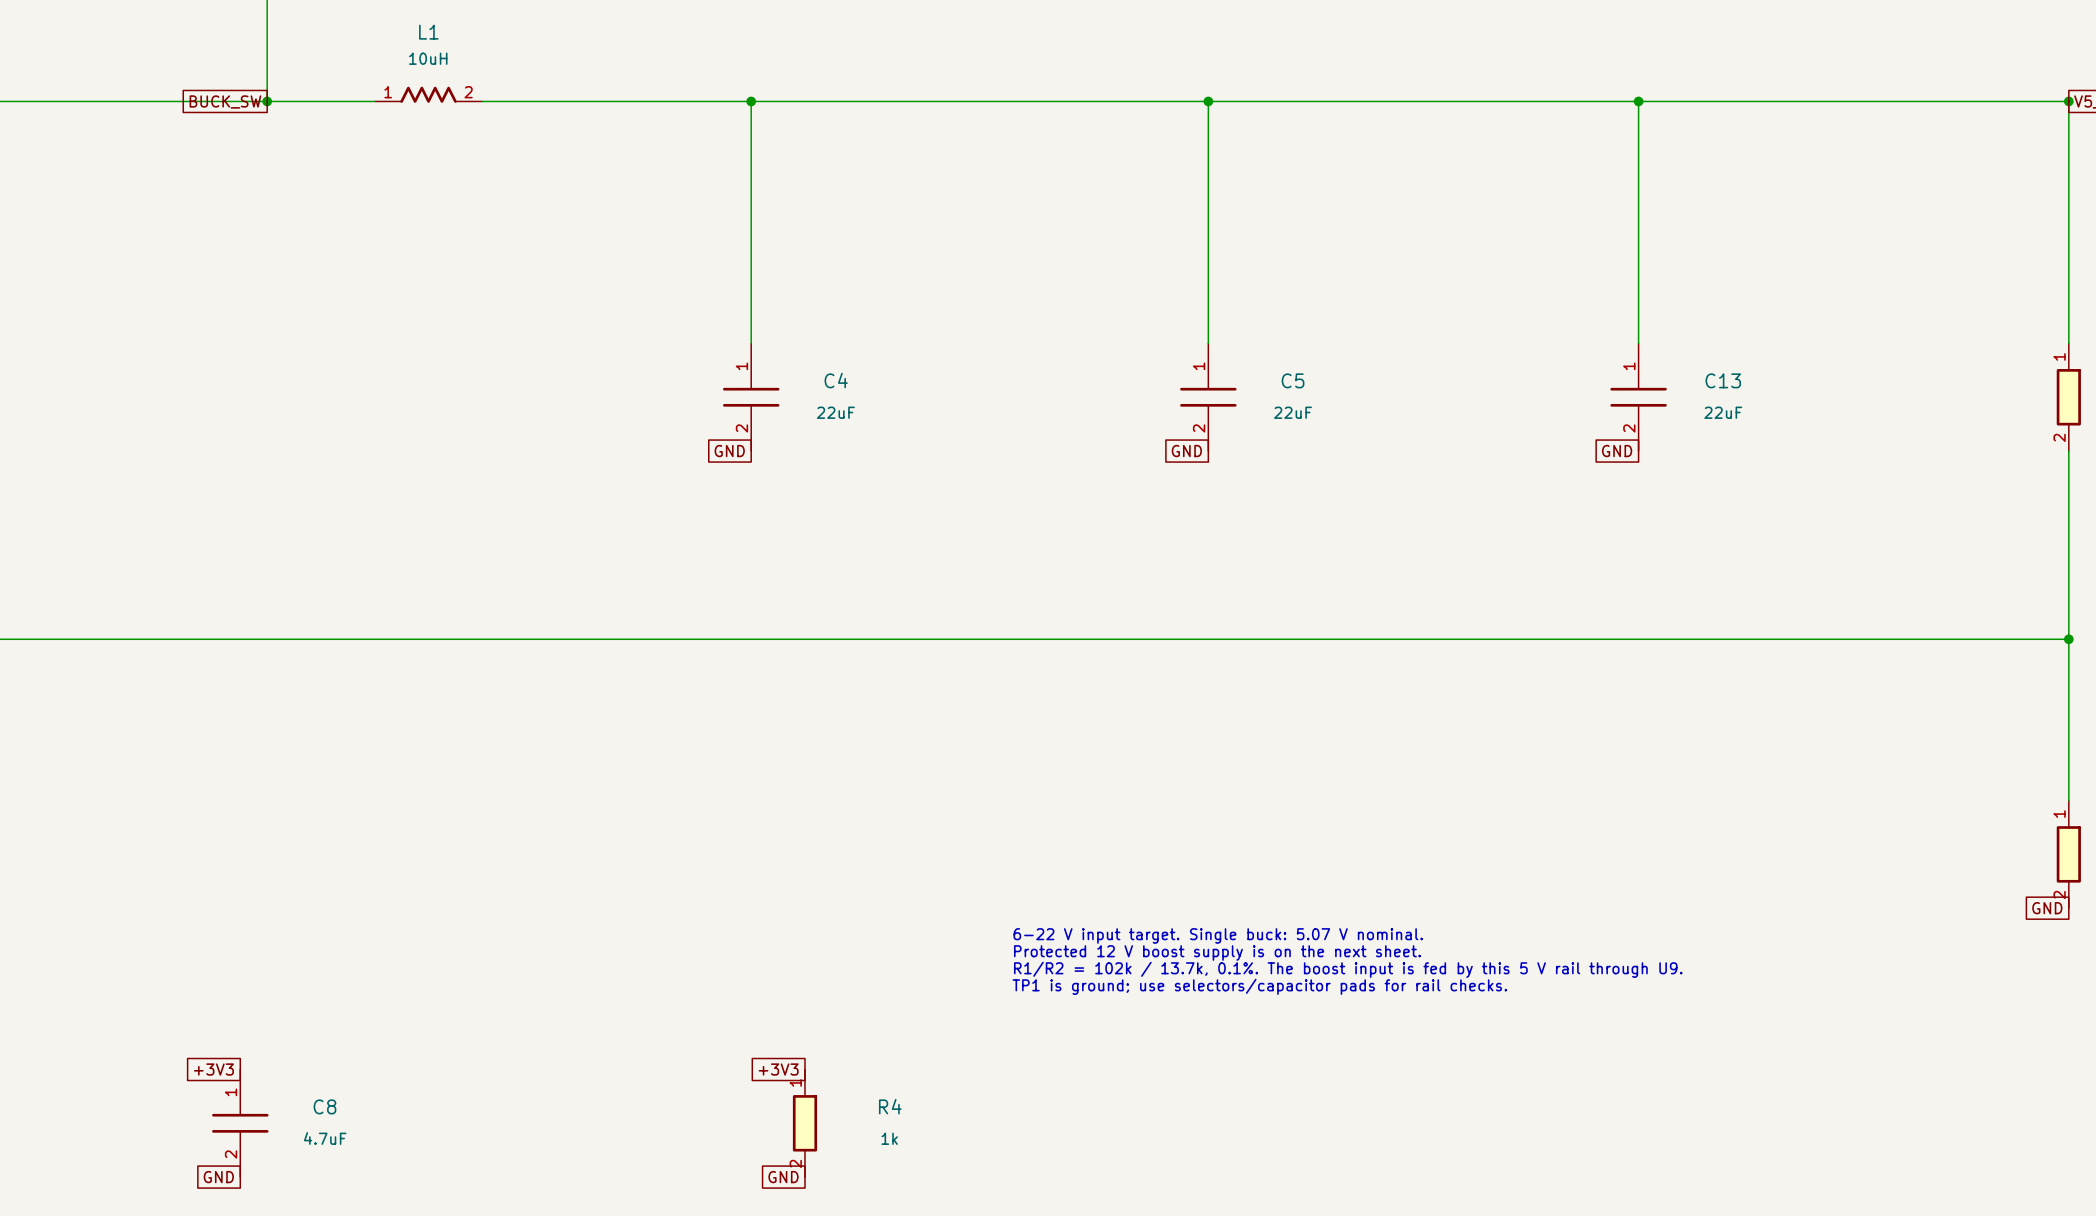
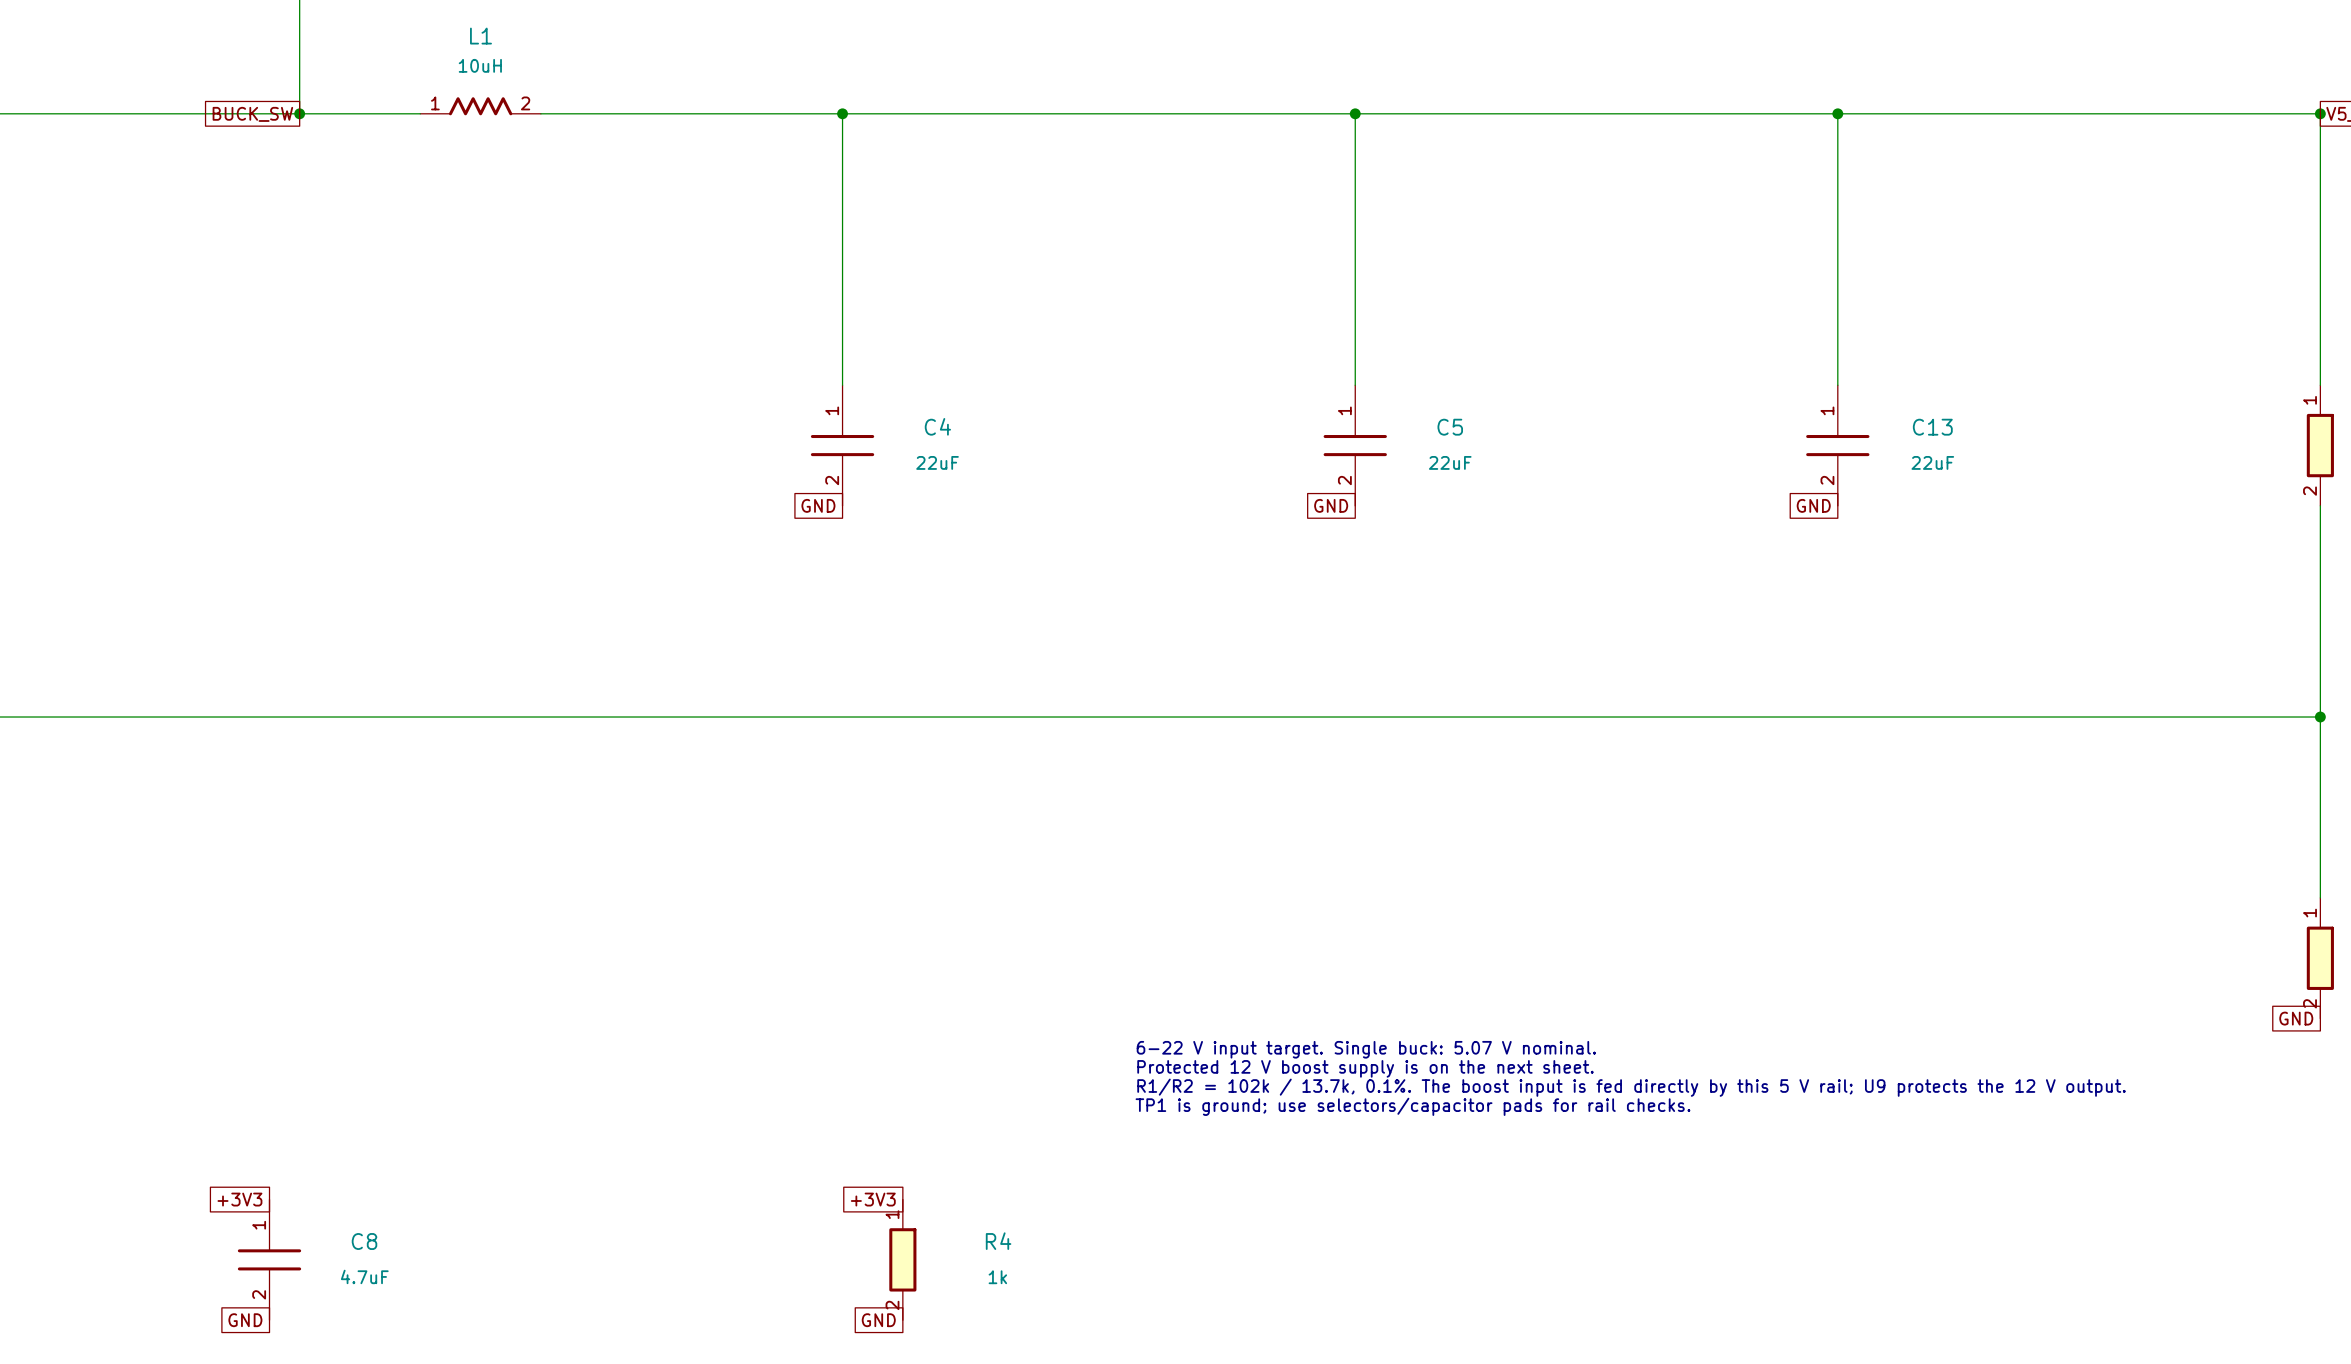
text: R1/R2 = 102k / 13.7k, 0.1%. The boost input is fed by this 5 V rail through U9. (1348, 969) -> R1/R2 = 102k / 13.7k, 0.1%. The boost input is fed directly by this 5 V rail; U9 protects the 12 V output. (1631, 1087)

